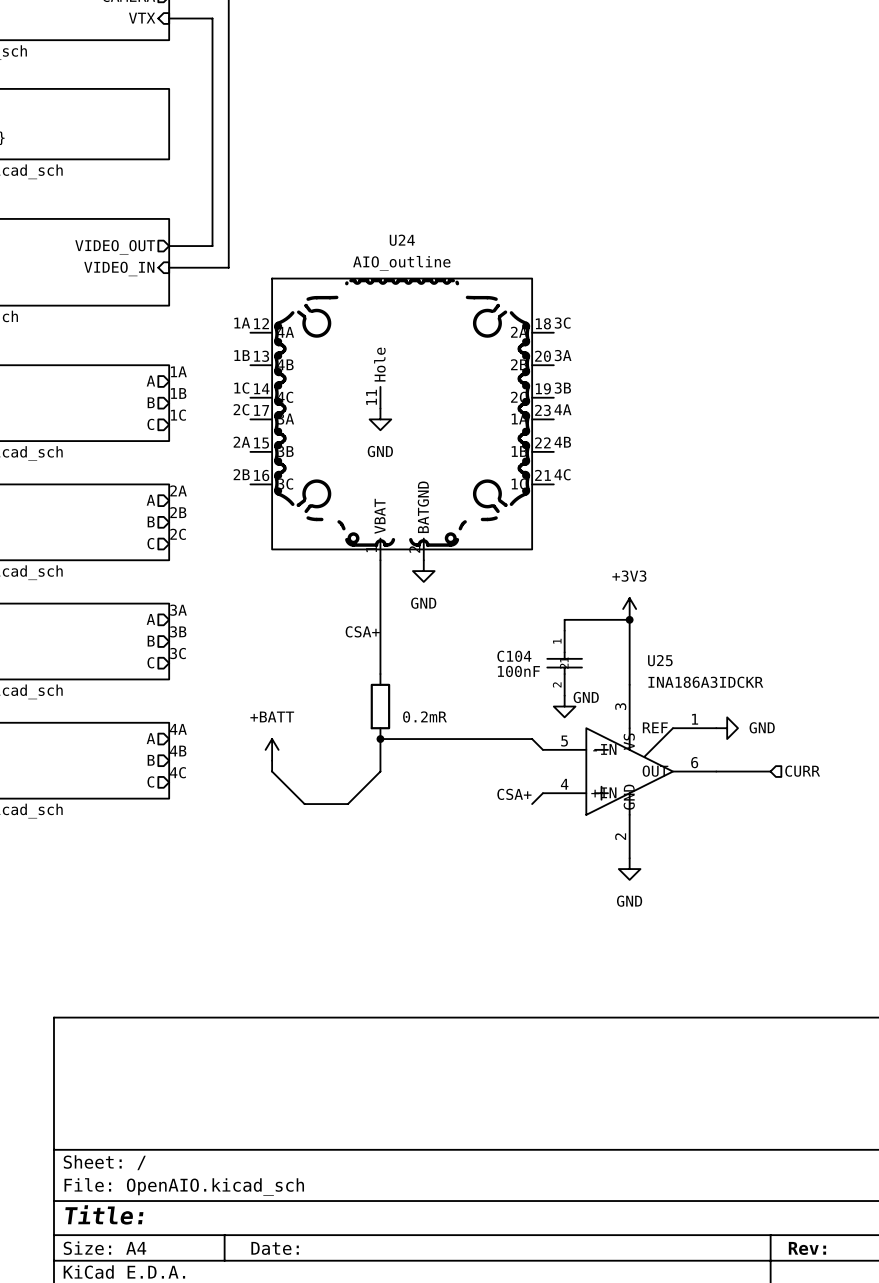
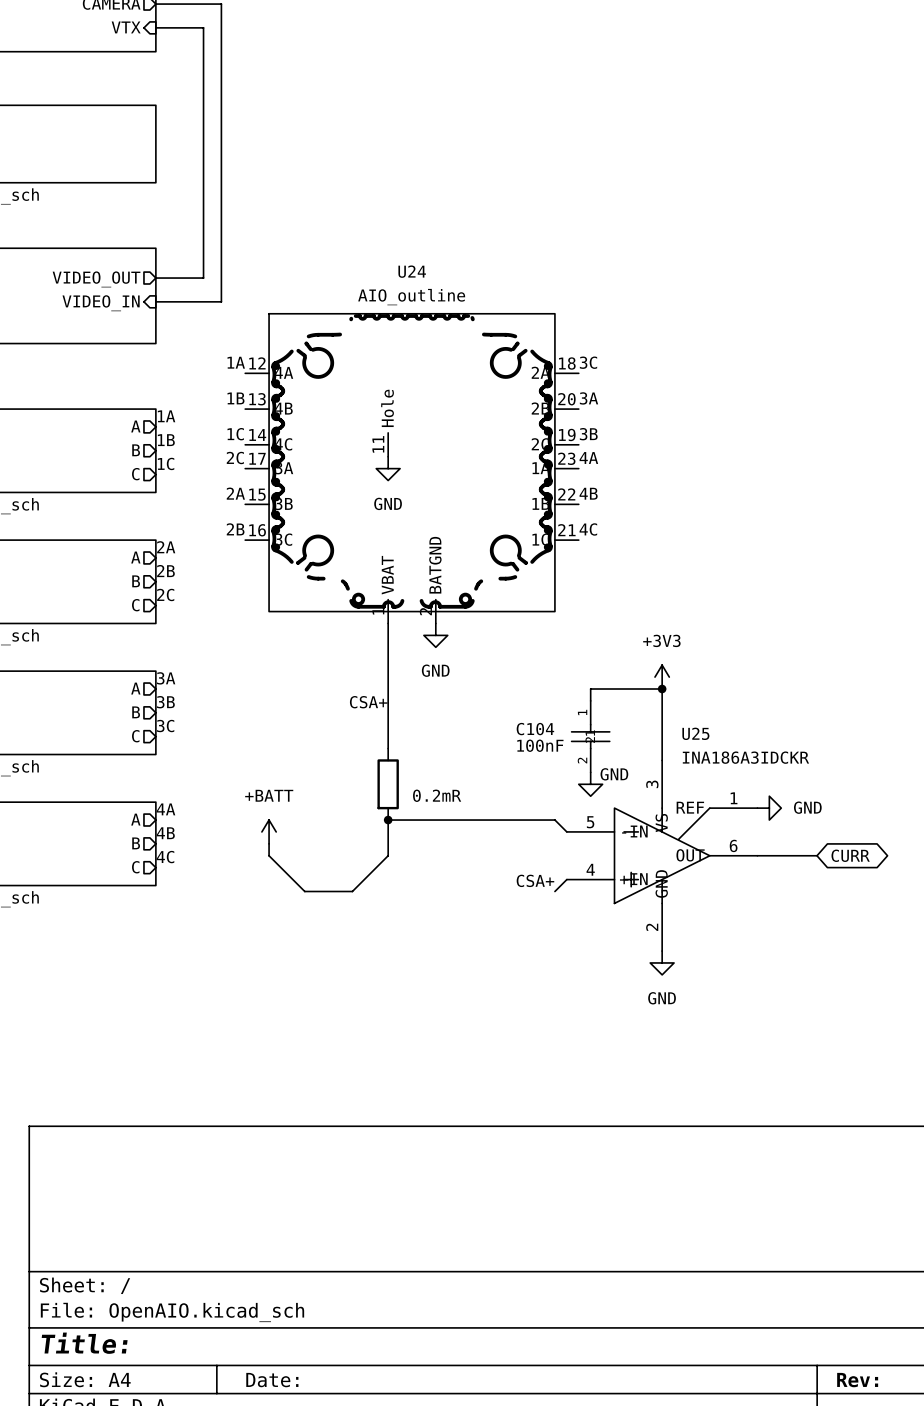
global label: none -> CURR (850, 855)
hierarchical label: CURR (802, 771) -> none

